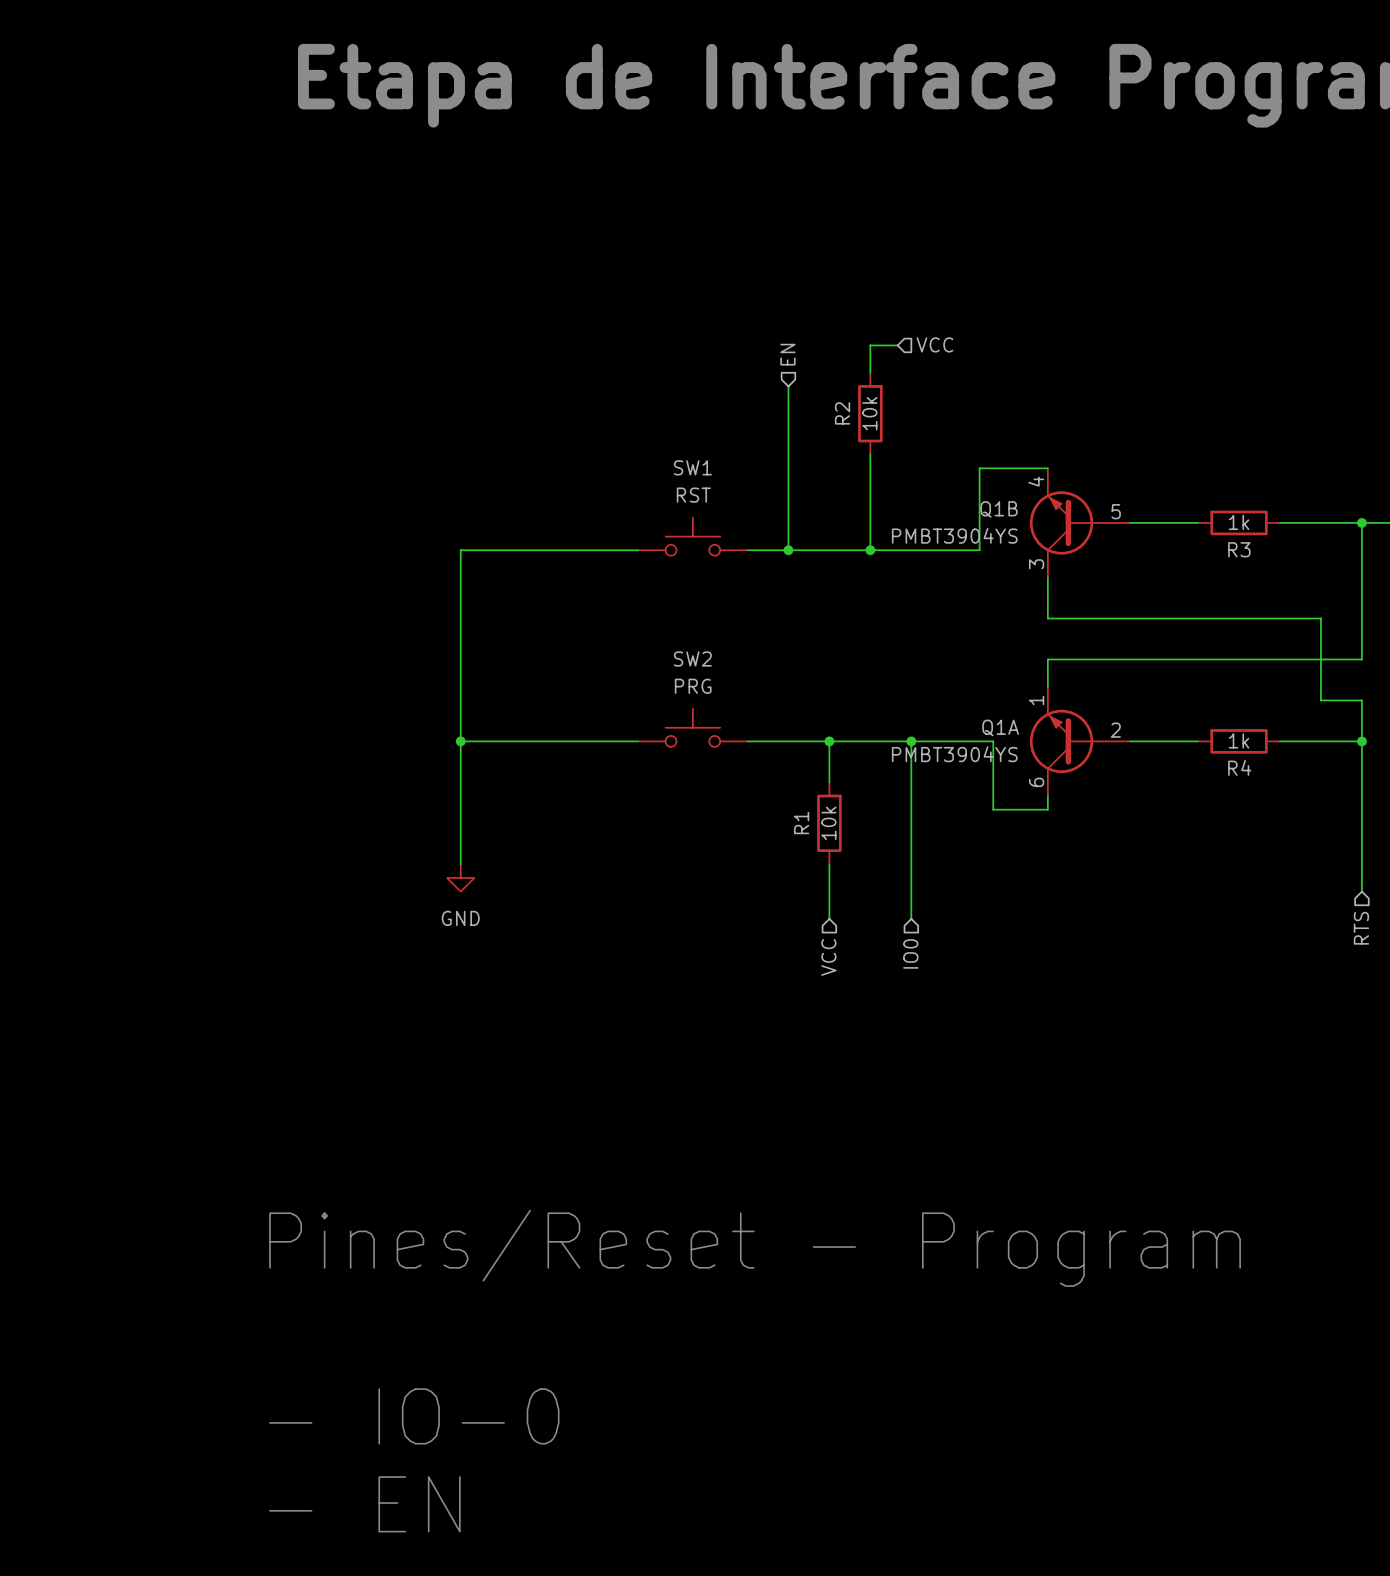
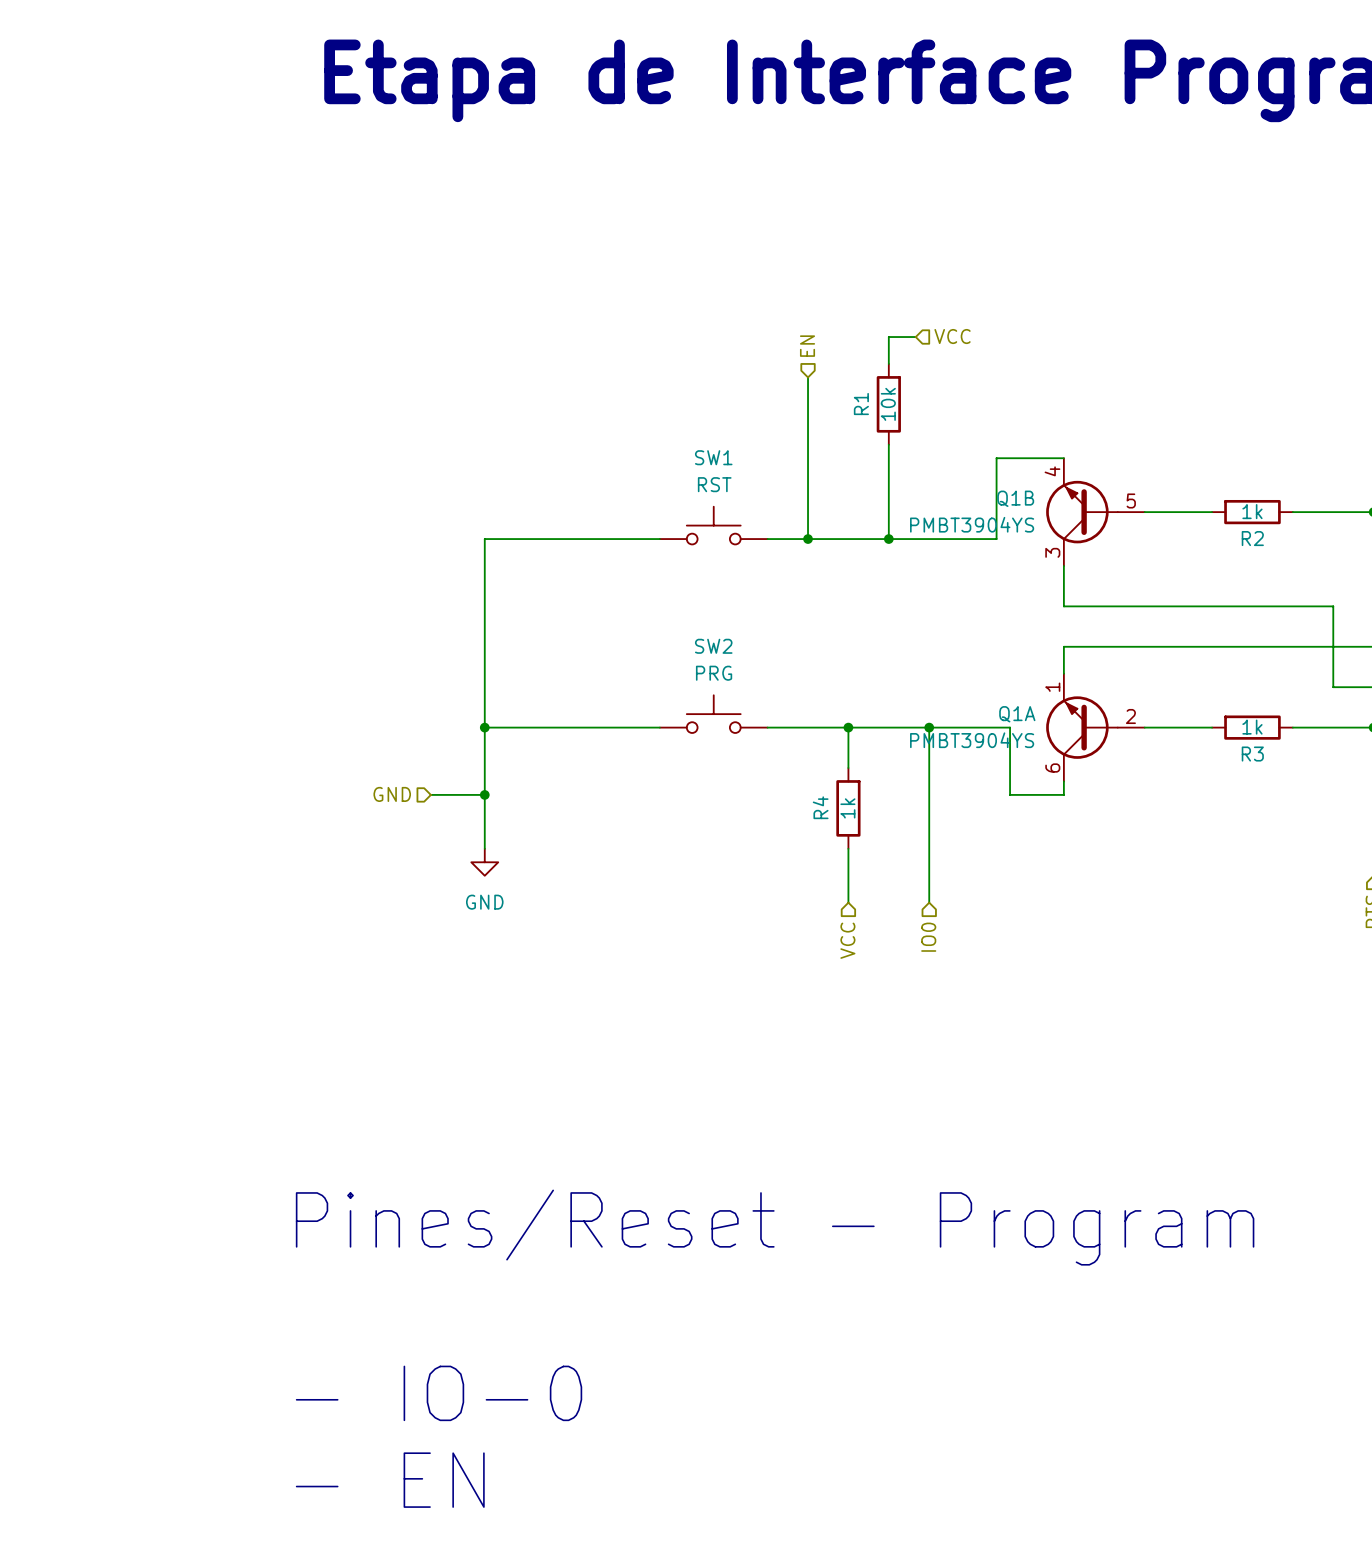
R2 name: R2 (842, 413) -> R1 (861, 404)
R3 name: R3 (1239, 549) -> R2 (1252, 538)
R4 name: R4 (1239, 767) -> R3 (1252, 754)
hierarchical label: none -> GND (392, 794)
wire: none -> (430, 794) (484, 794)
junction: none -> (484, 794)
R1 name: R1 (801, 823) -> R4 (820, 807)
R1 value: 10k (828, 823) -> 1k (847, 808)

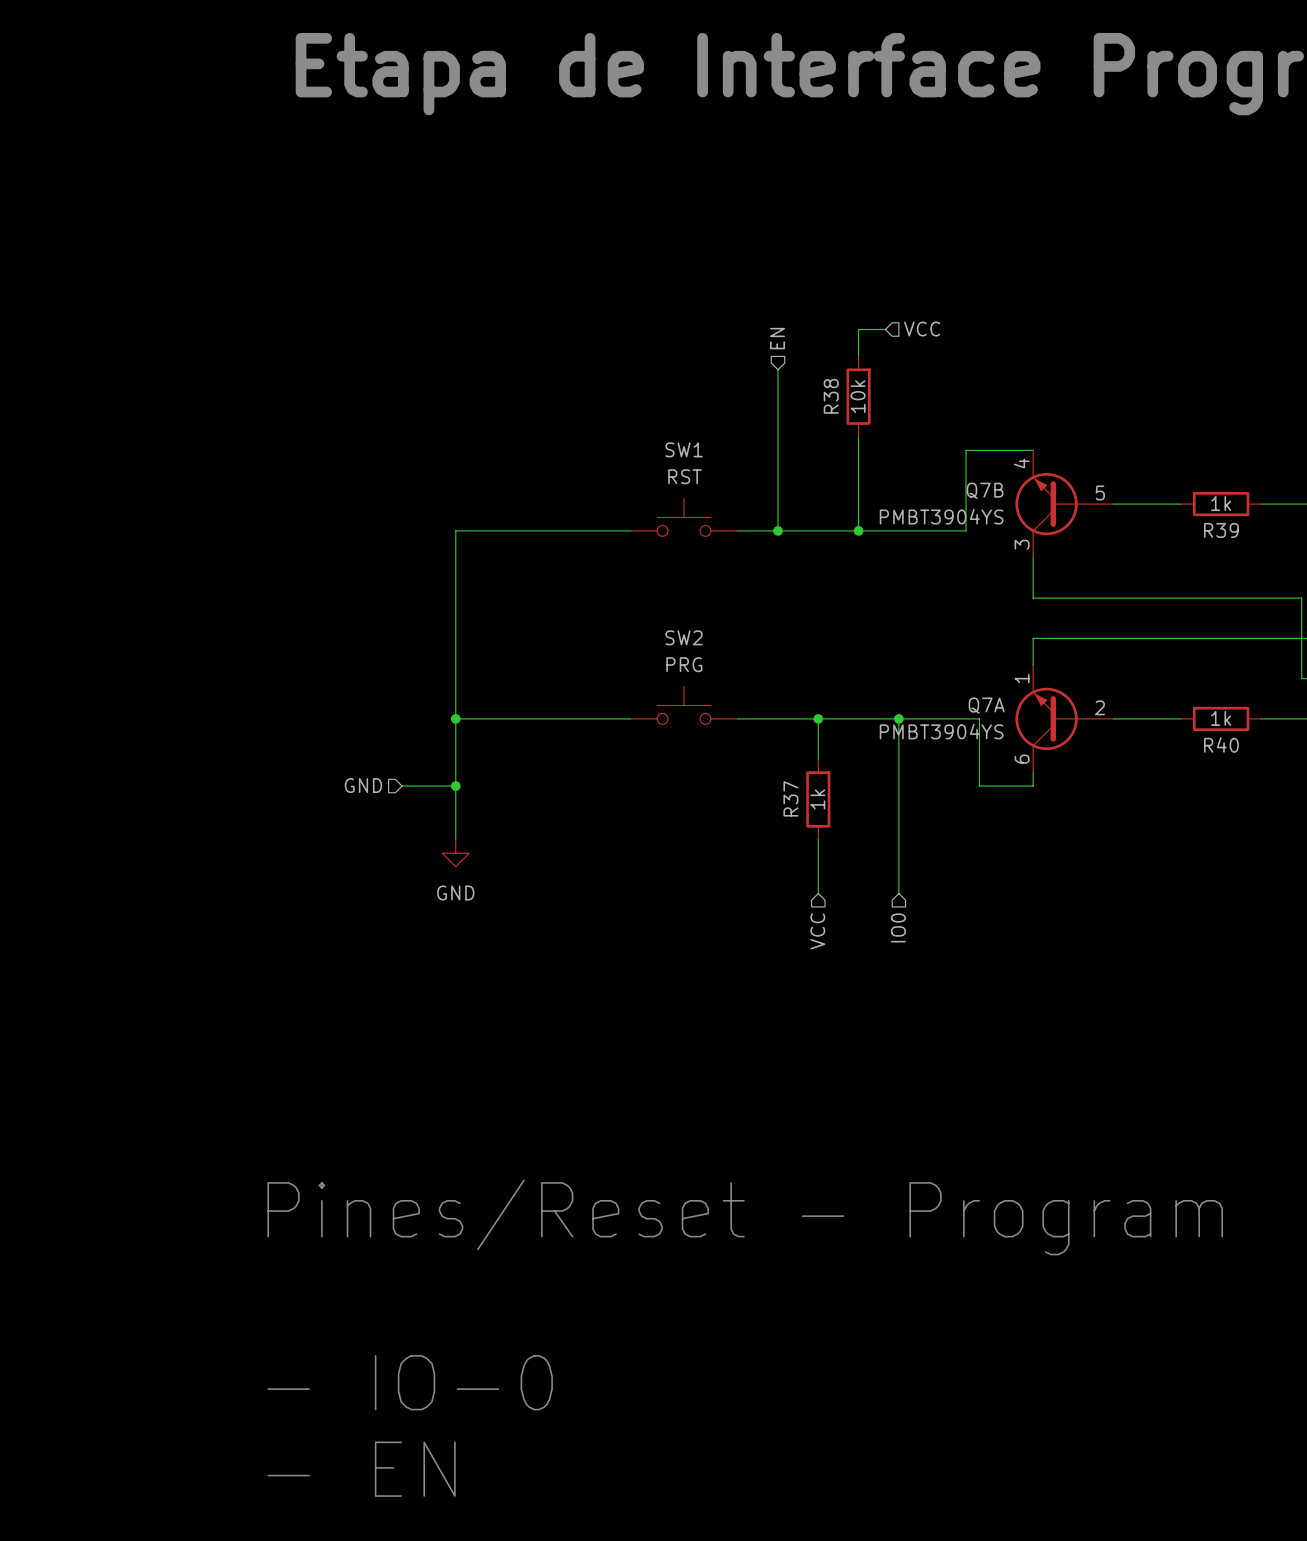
R1 name: R1 (861, 404) -> R38 (831, 396)
Q1B name: Q1B (1015, 498) -> Q7B (985, 490)
R2 name: R2 (1252, 538) -> R39 (1221, 530)
Q1A name: Q1A (1017, 714) -> Q7A (986, 705)
R3 name: R3 (1252, 754) -> R40 (1221, 744)
R4 name: R4 (820, 807) -> R37 (790, 798)

